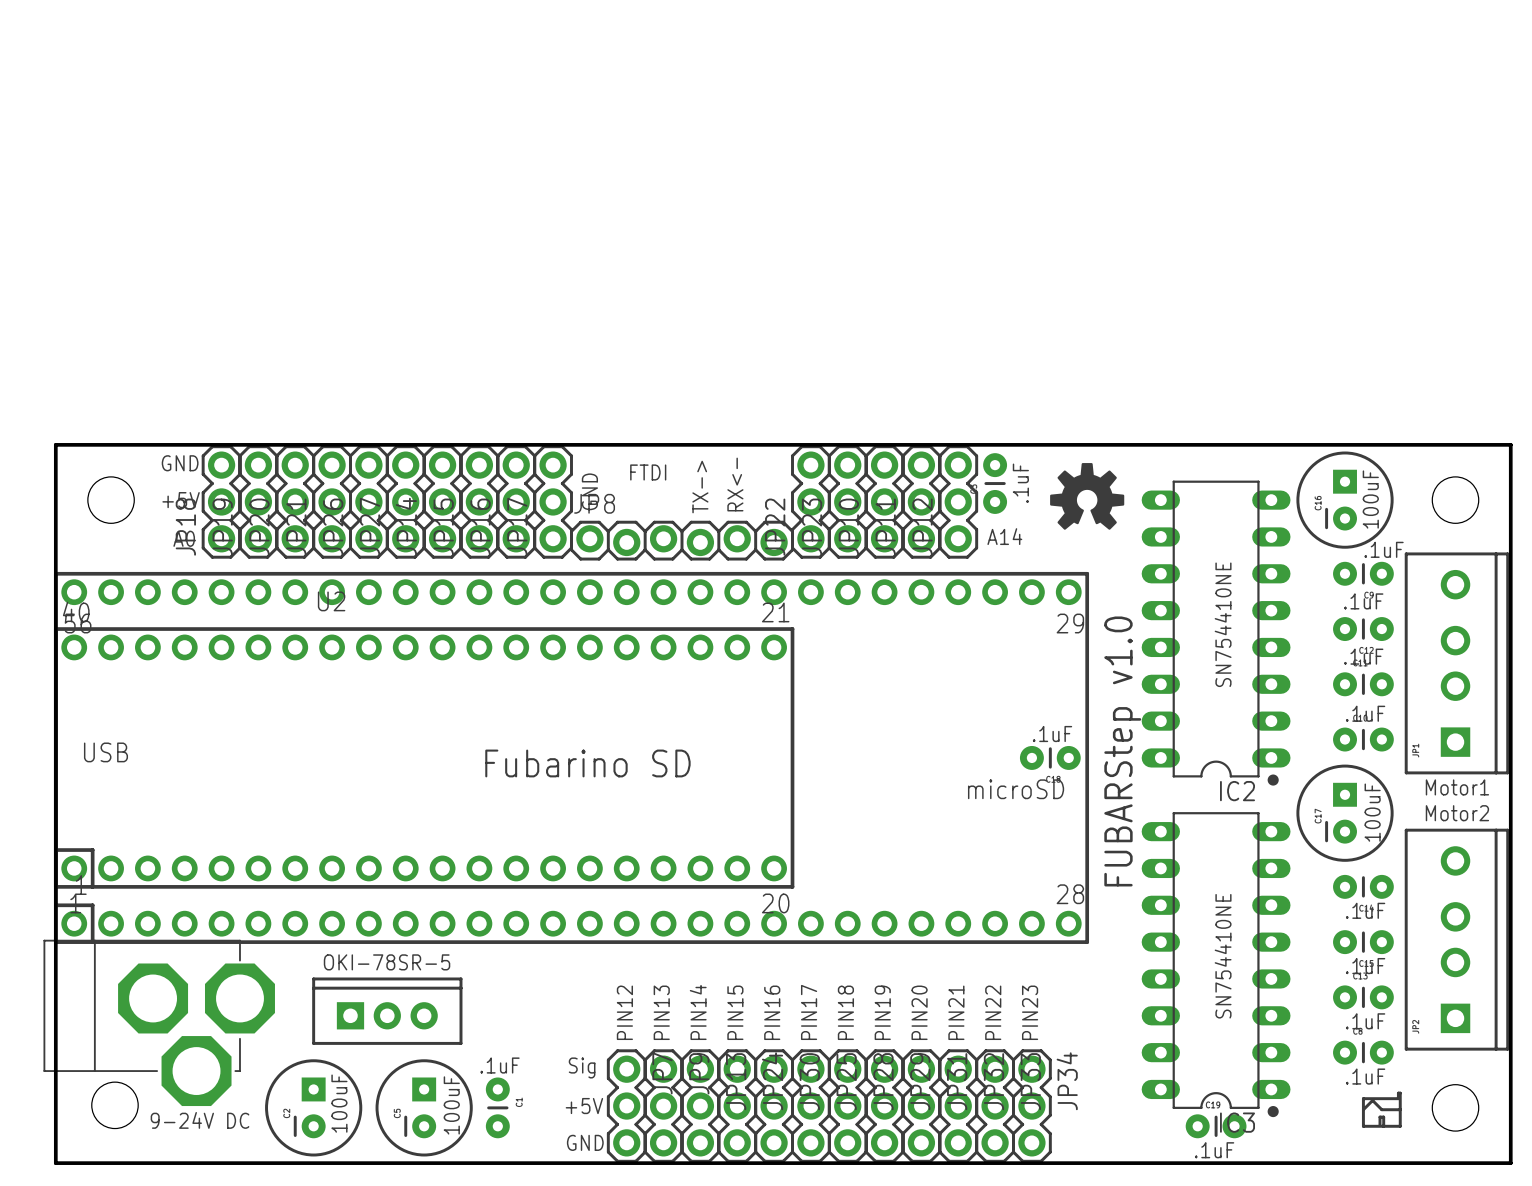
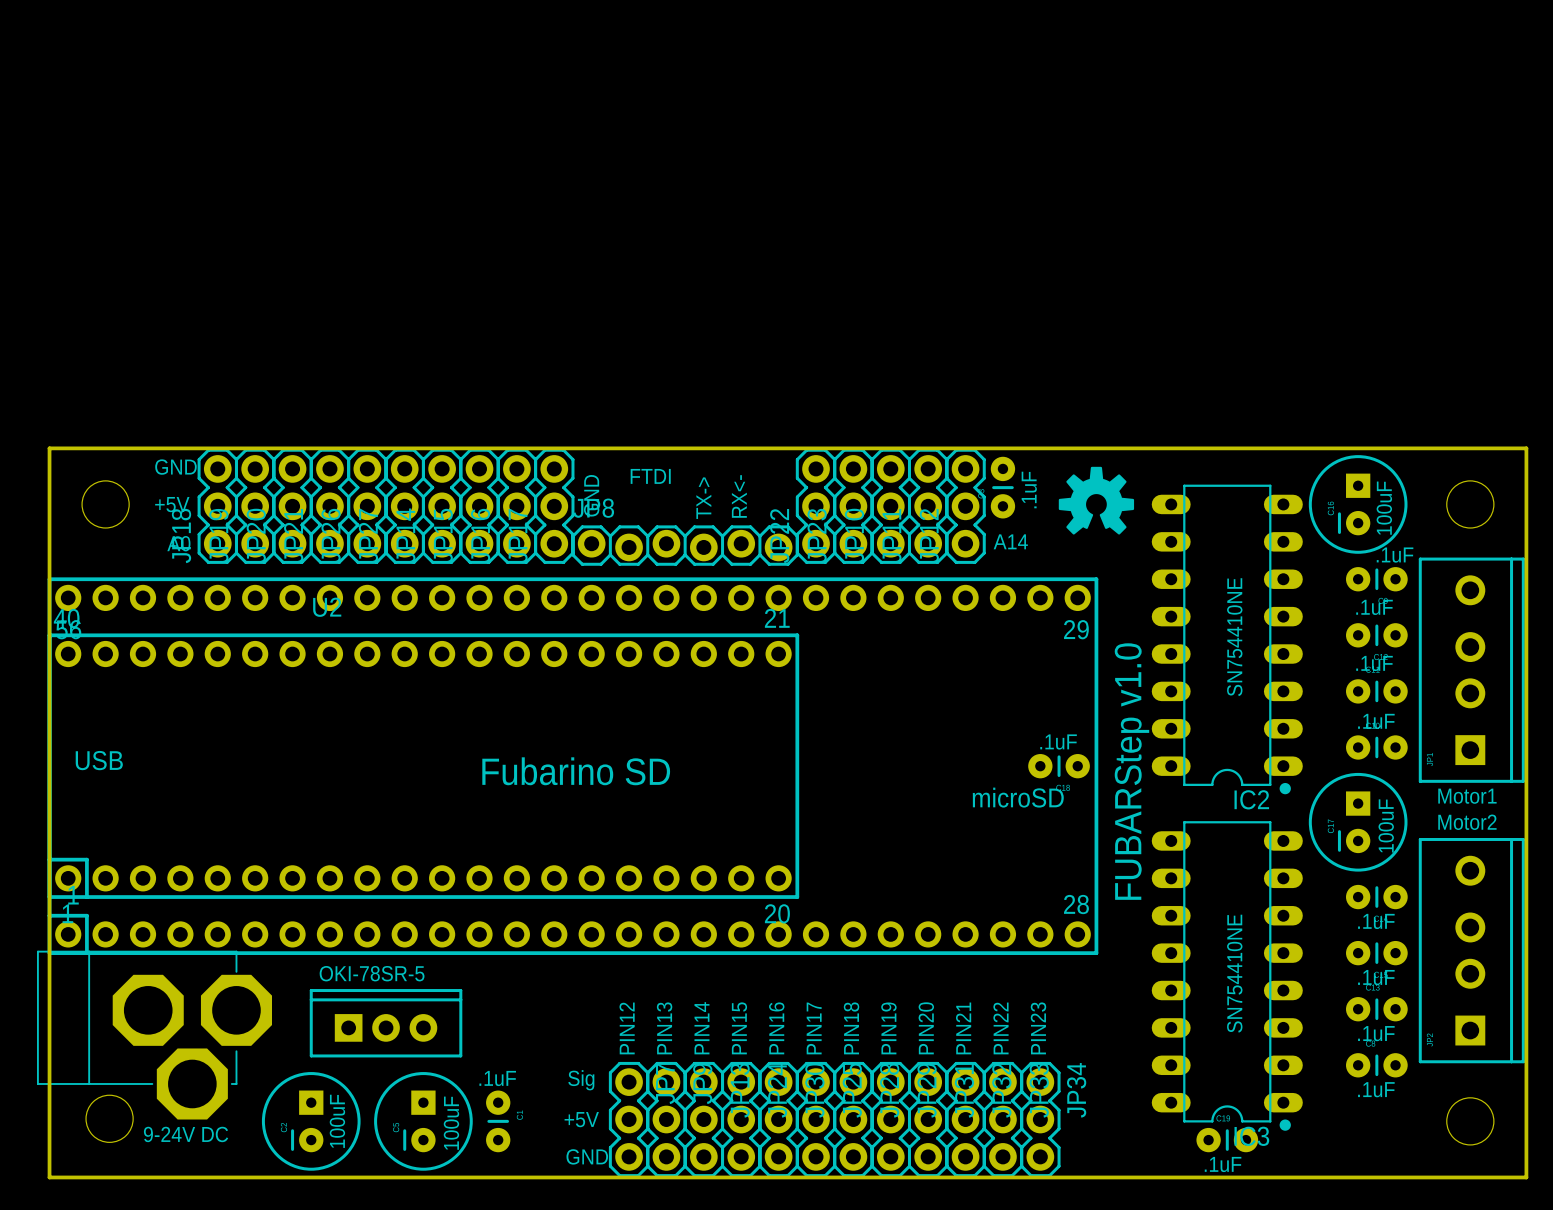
drawing: [1361, 1091, 1402, 1128] -> none

